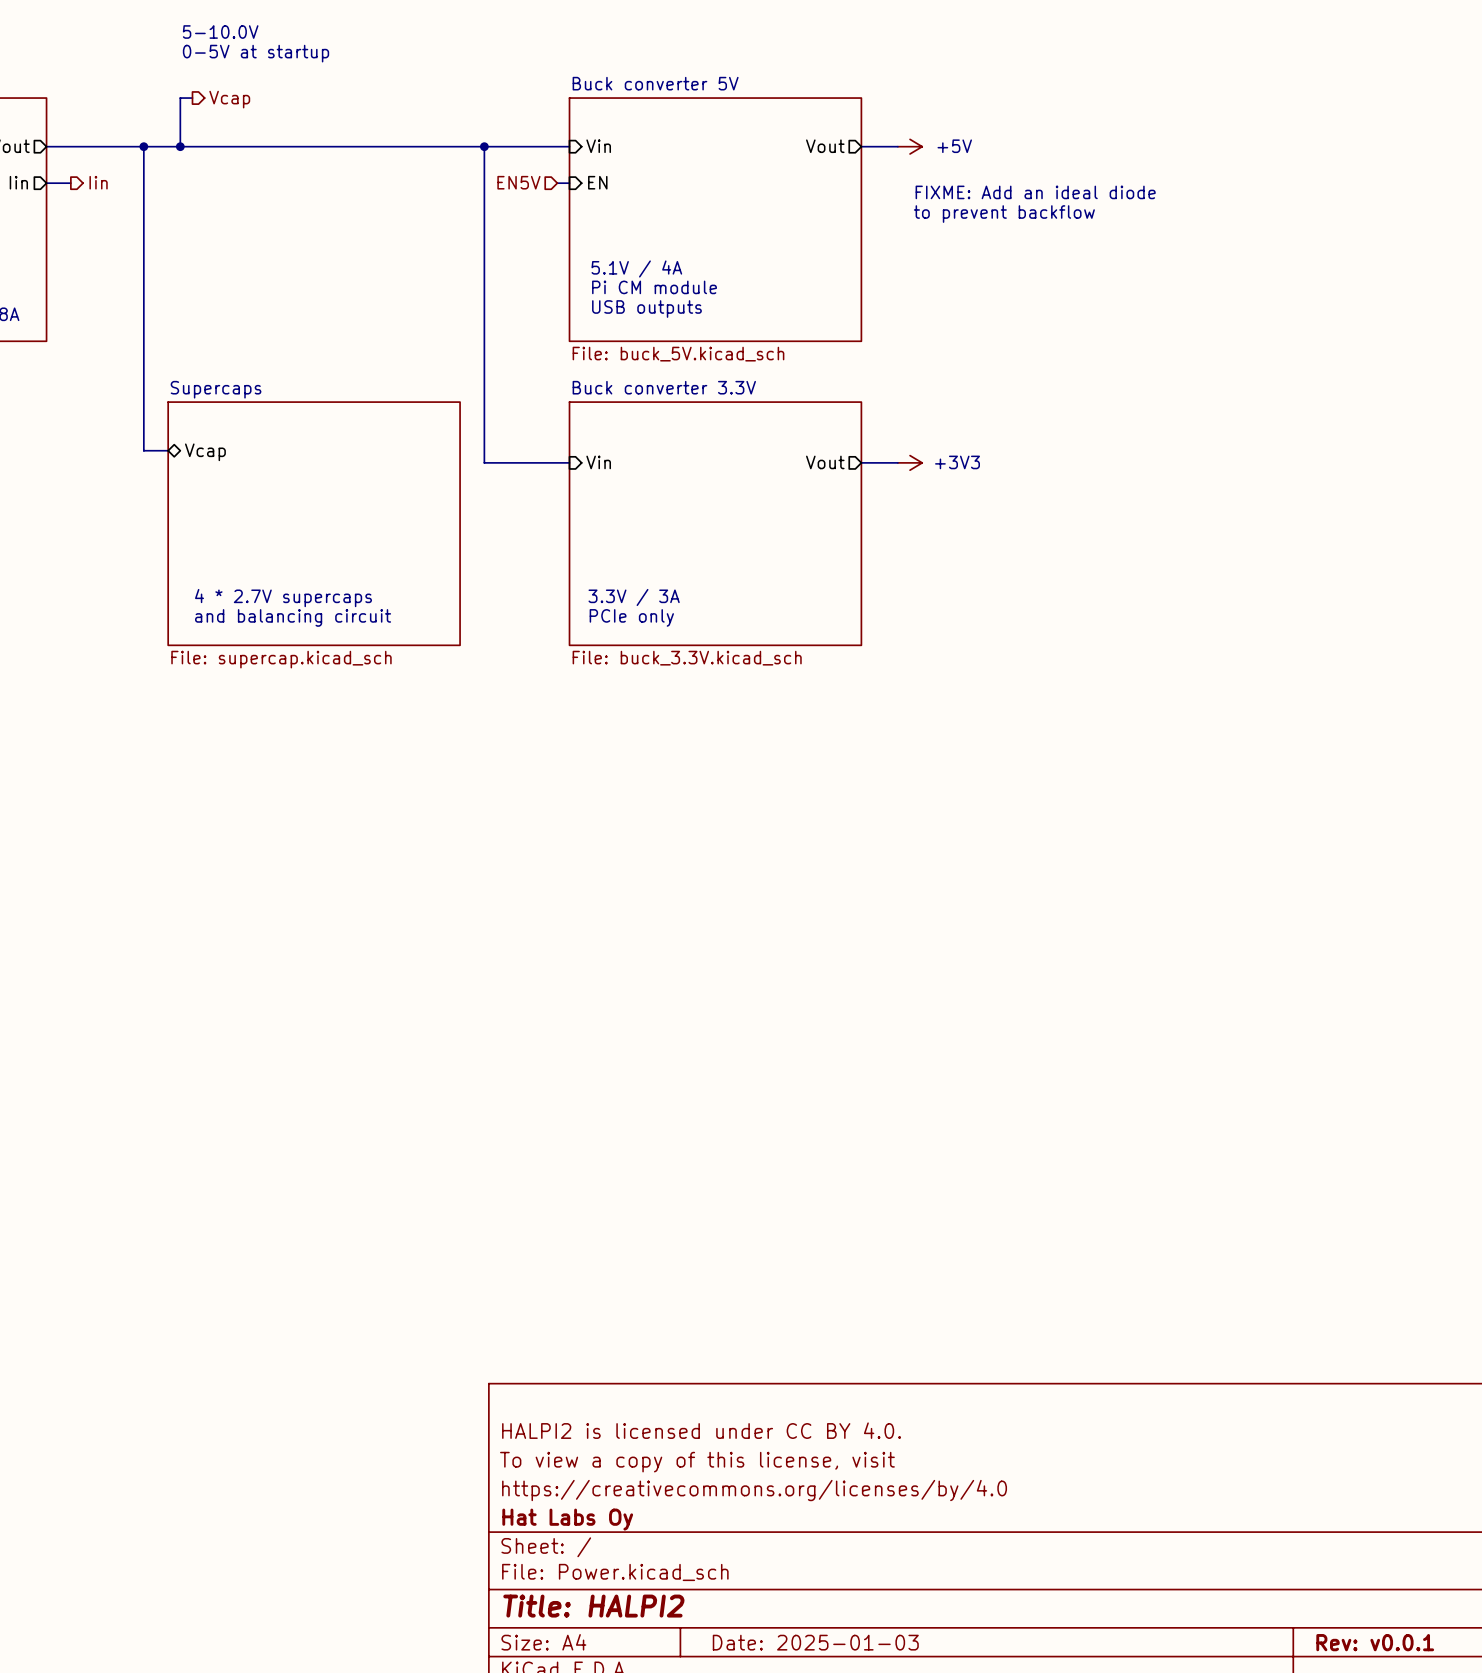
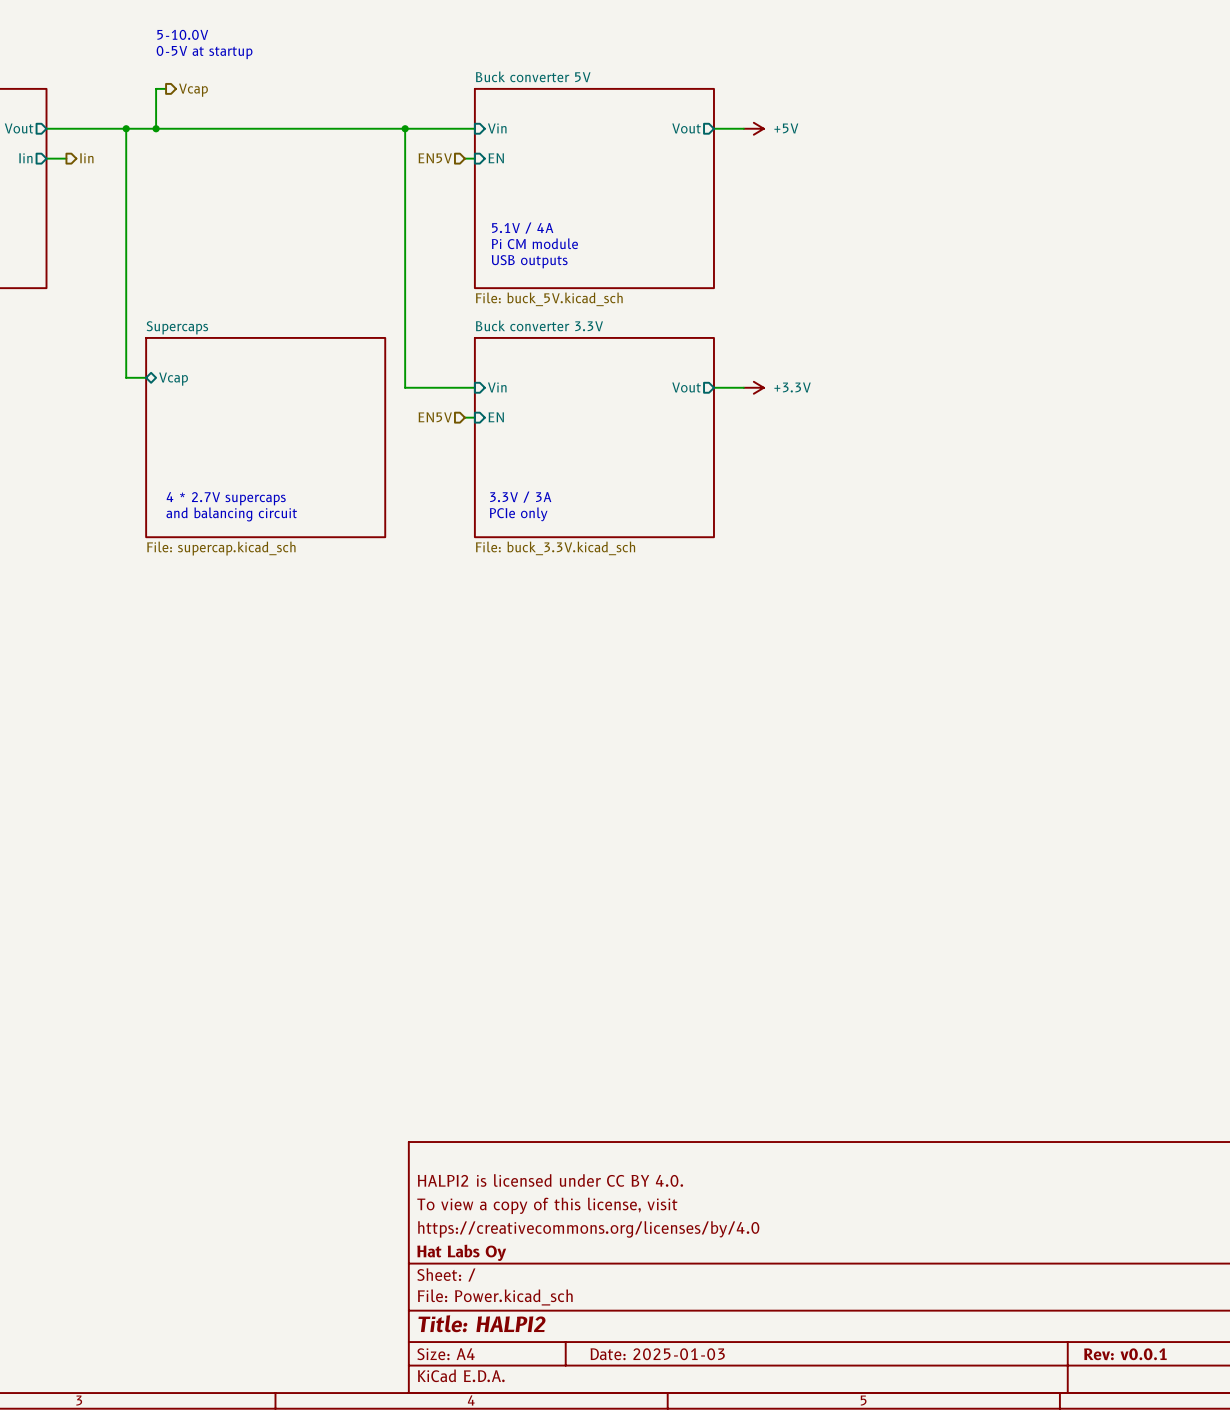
text: FIXME: Add an ideal diode (1035, 192) -> none
text: to prevent backflow (1004, 214) -> none
power symbol: +3V3 (910, 462) -> +3.3V (753, 387)
hierarchical label: none -> EN5V (435, 417)
sheet pin: none -> EN (496, 417)
wire: none -> (464, 417) (474, 417)

